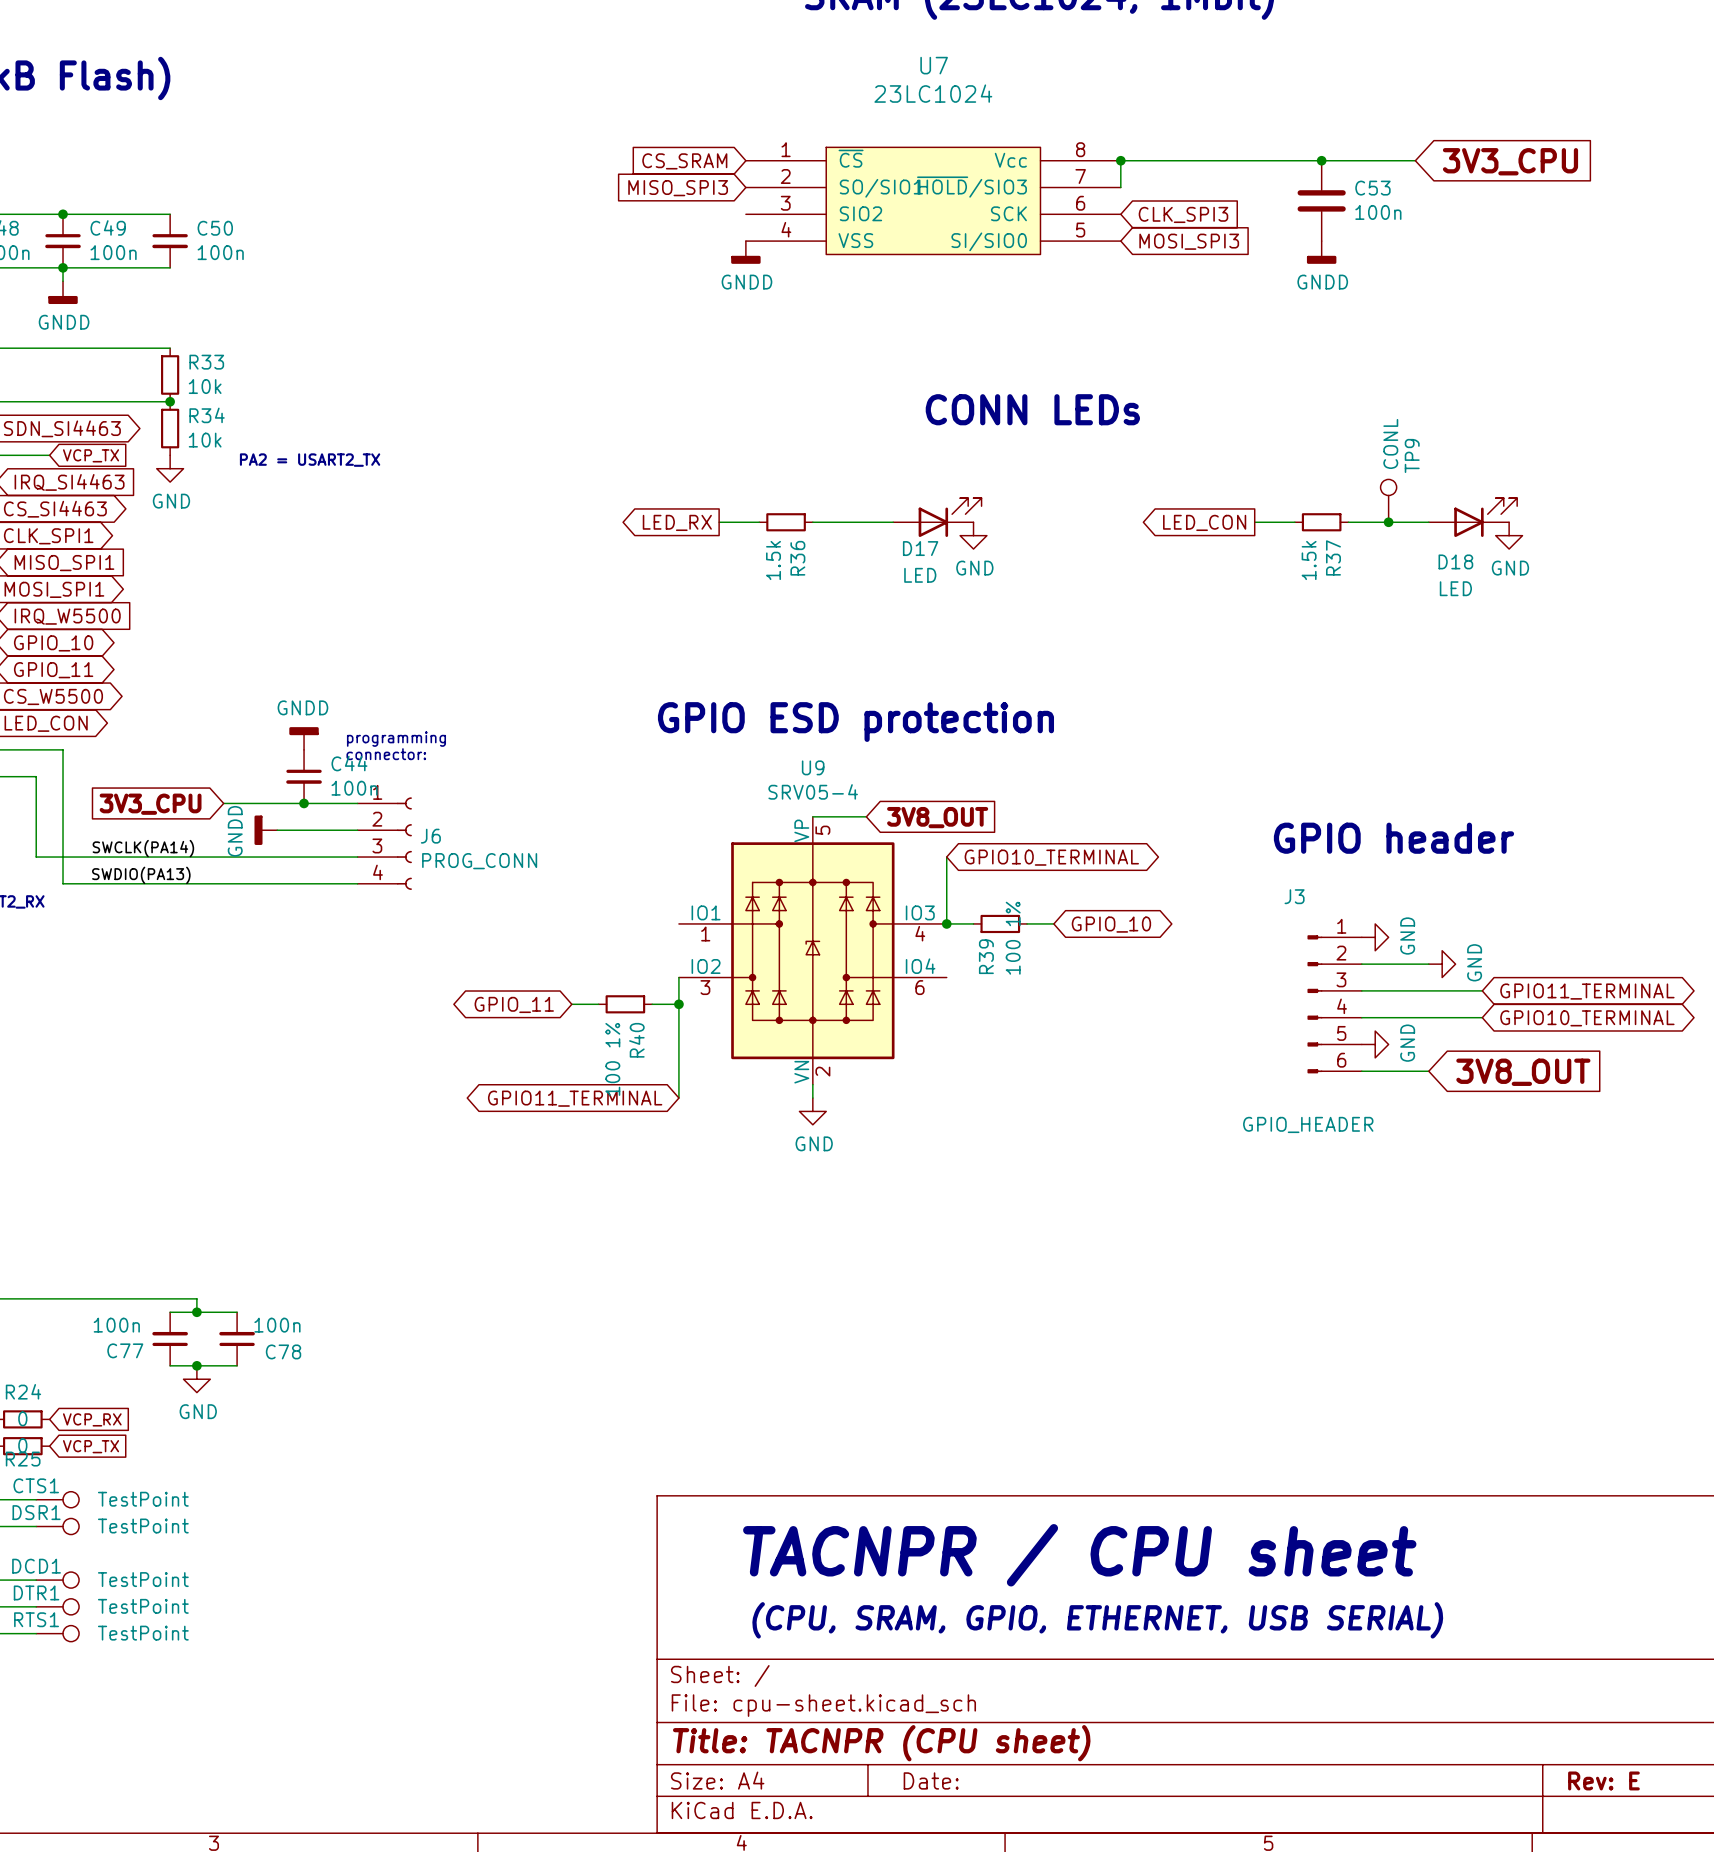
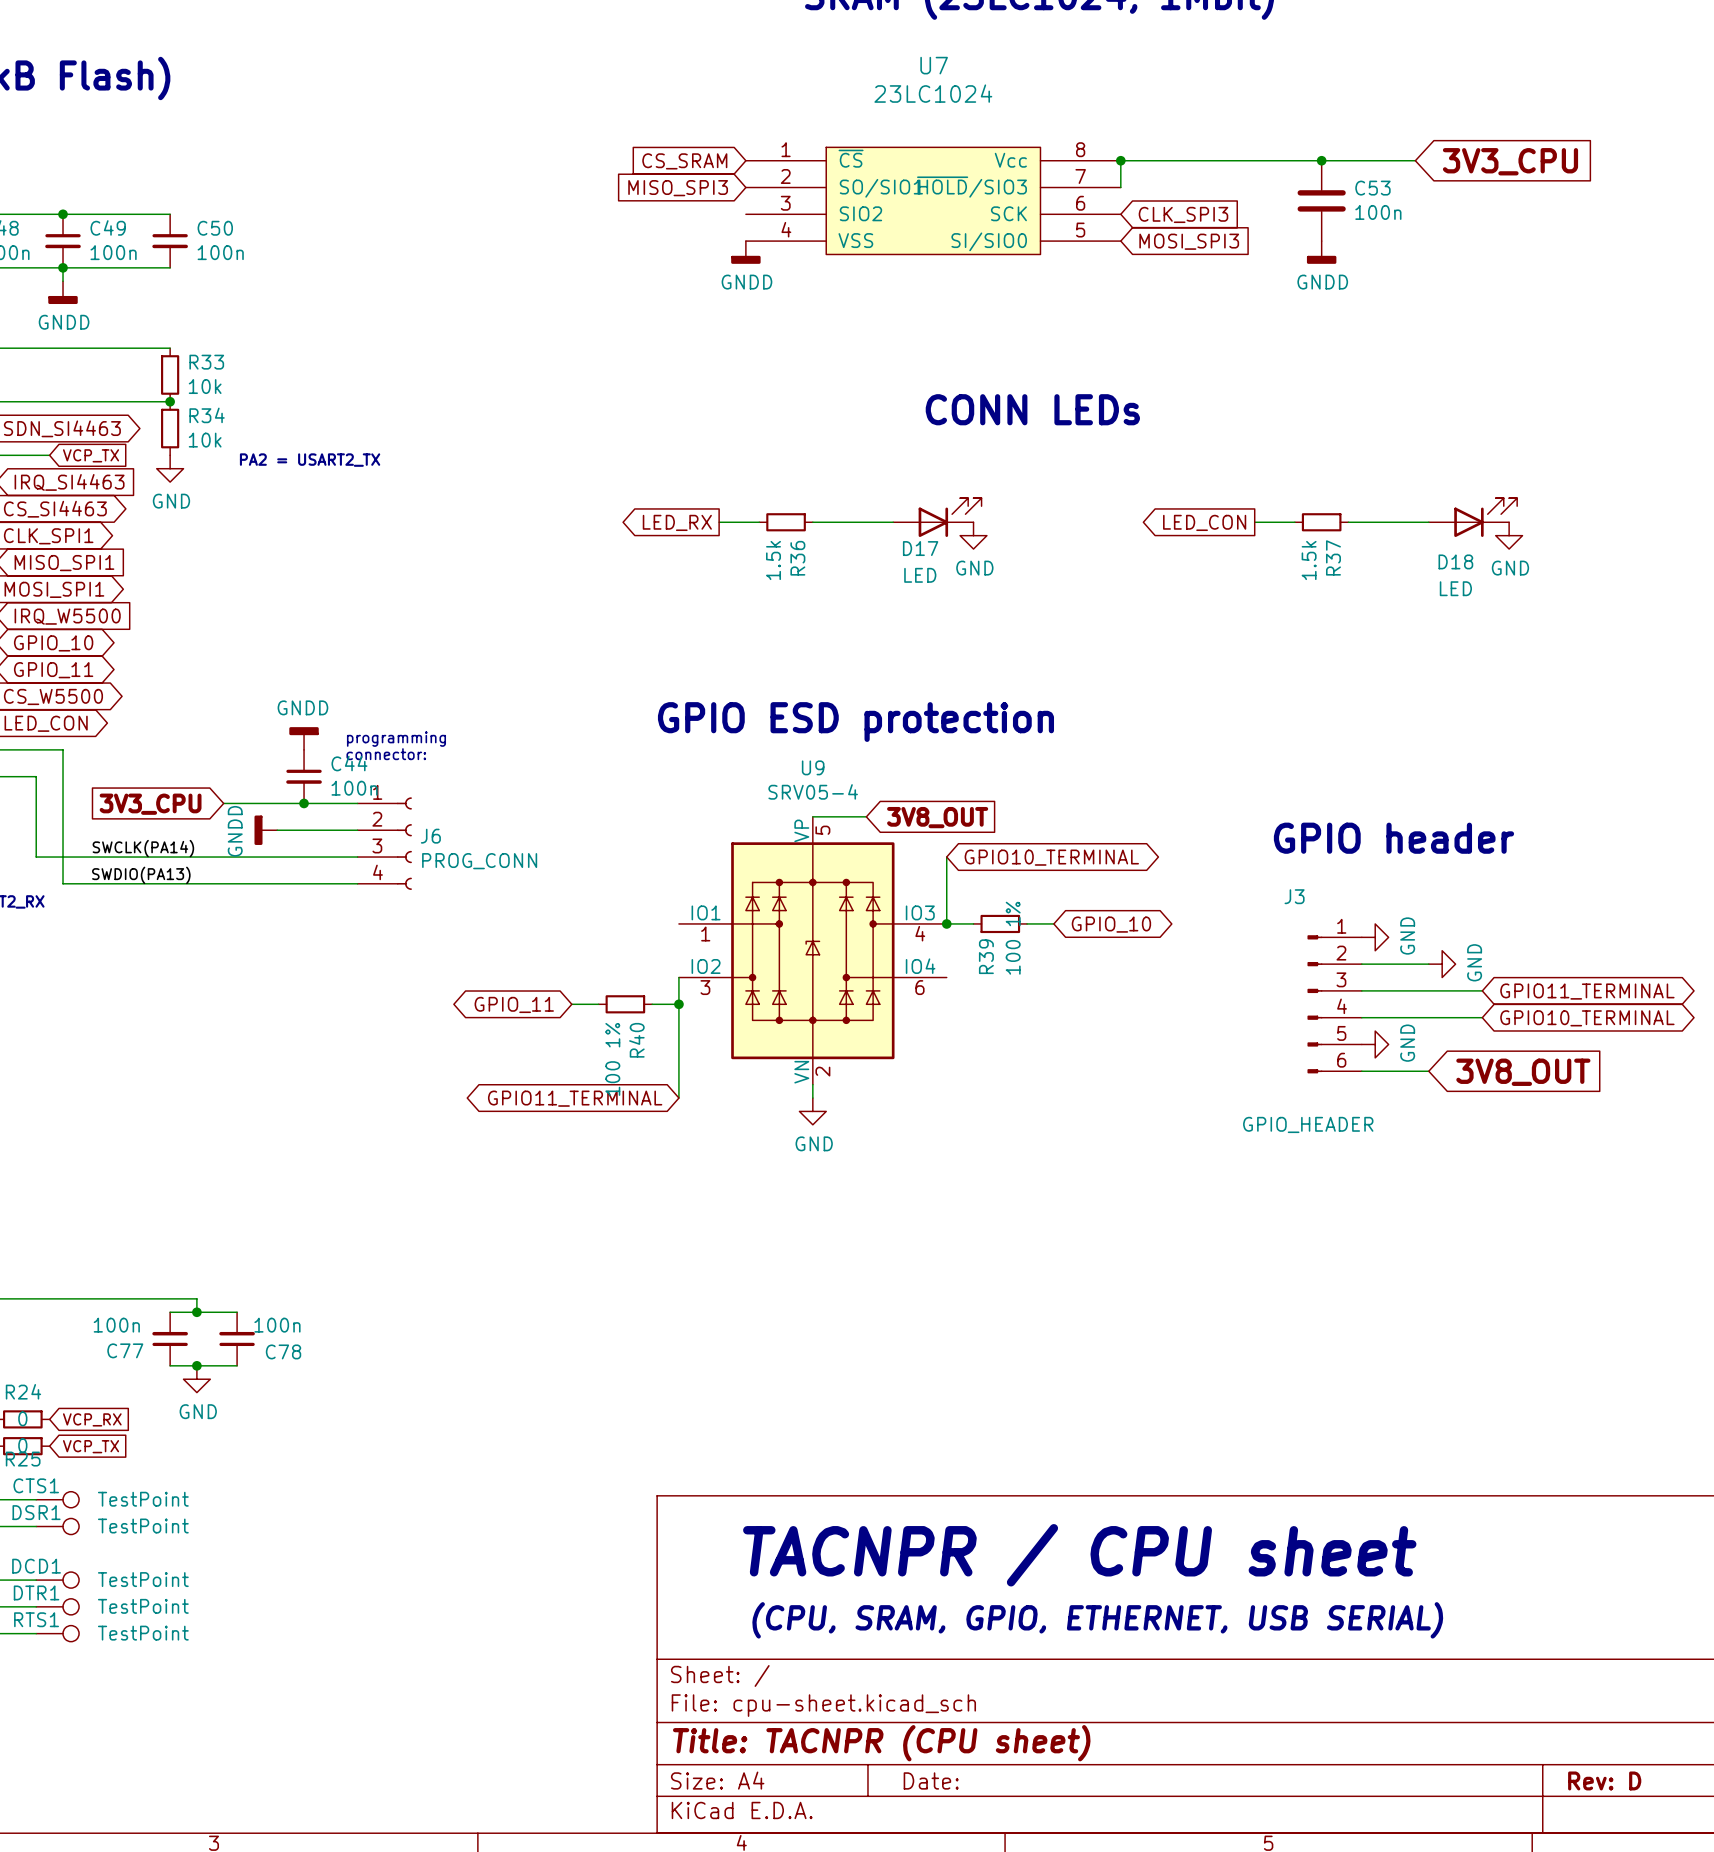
TP9: CONL (1388, 500) -> none
junction: (1388, 522) -> none
title block: Rev: E (1603, 1780) -> Rev: D (1604, 1780)

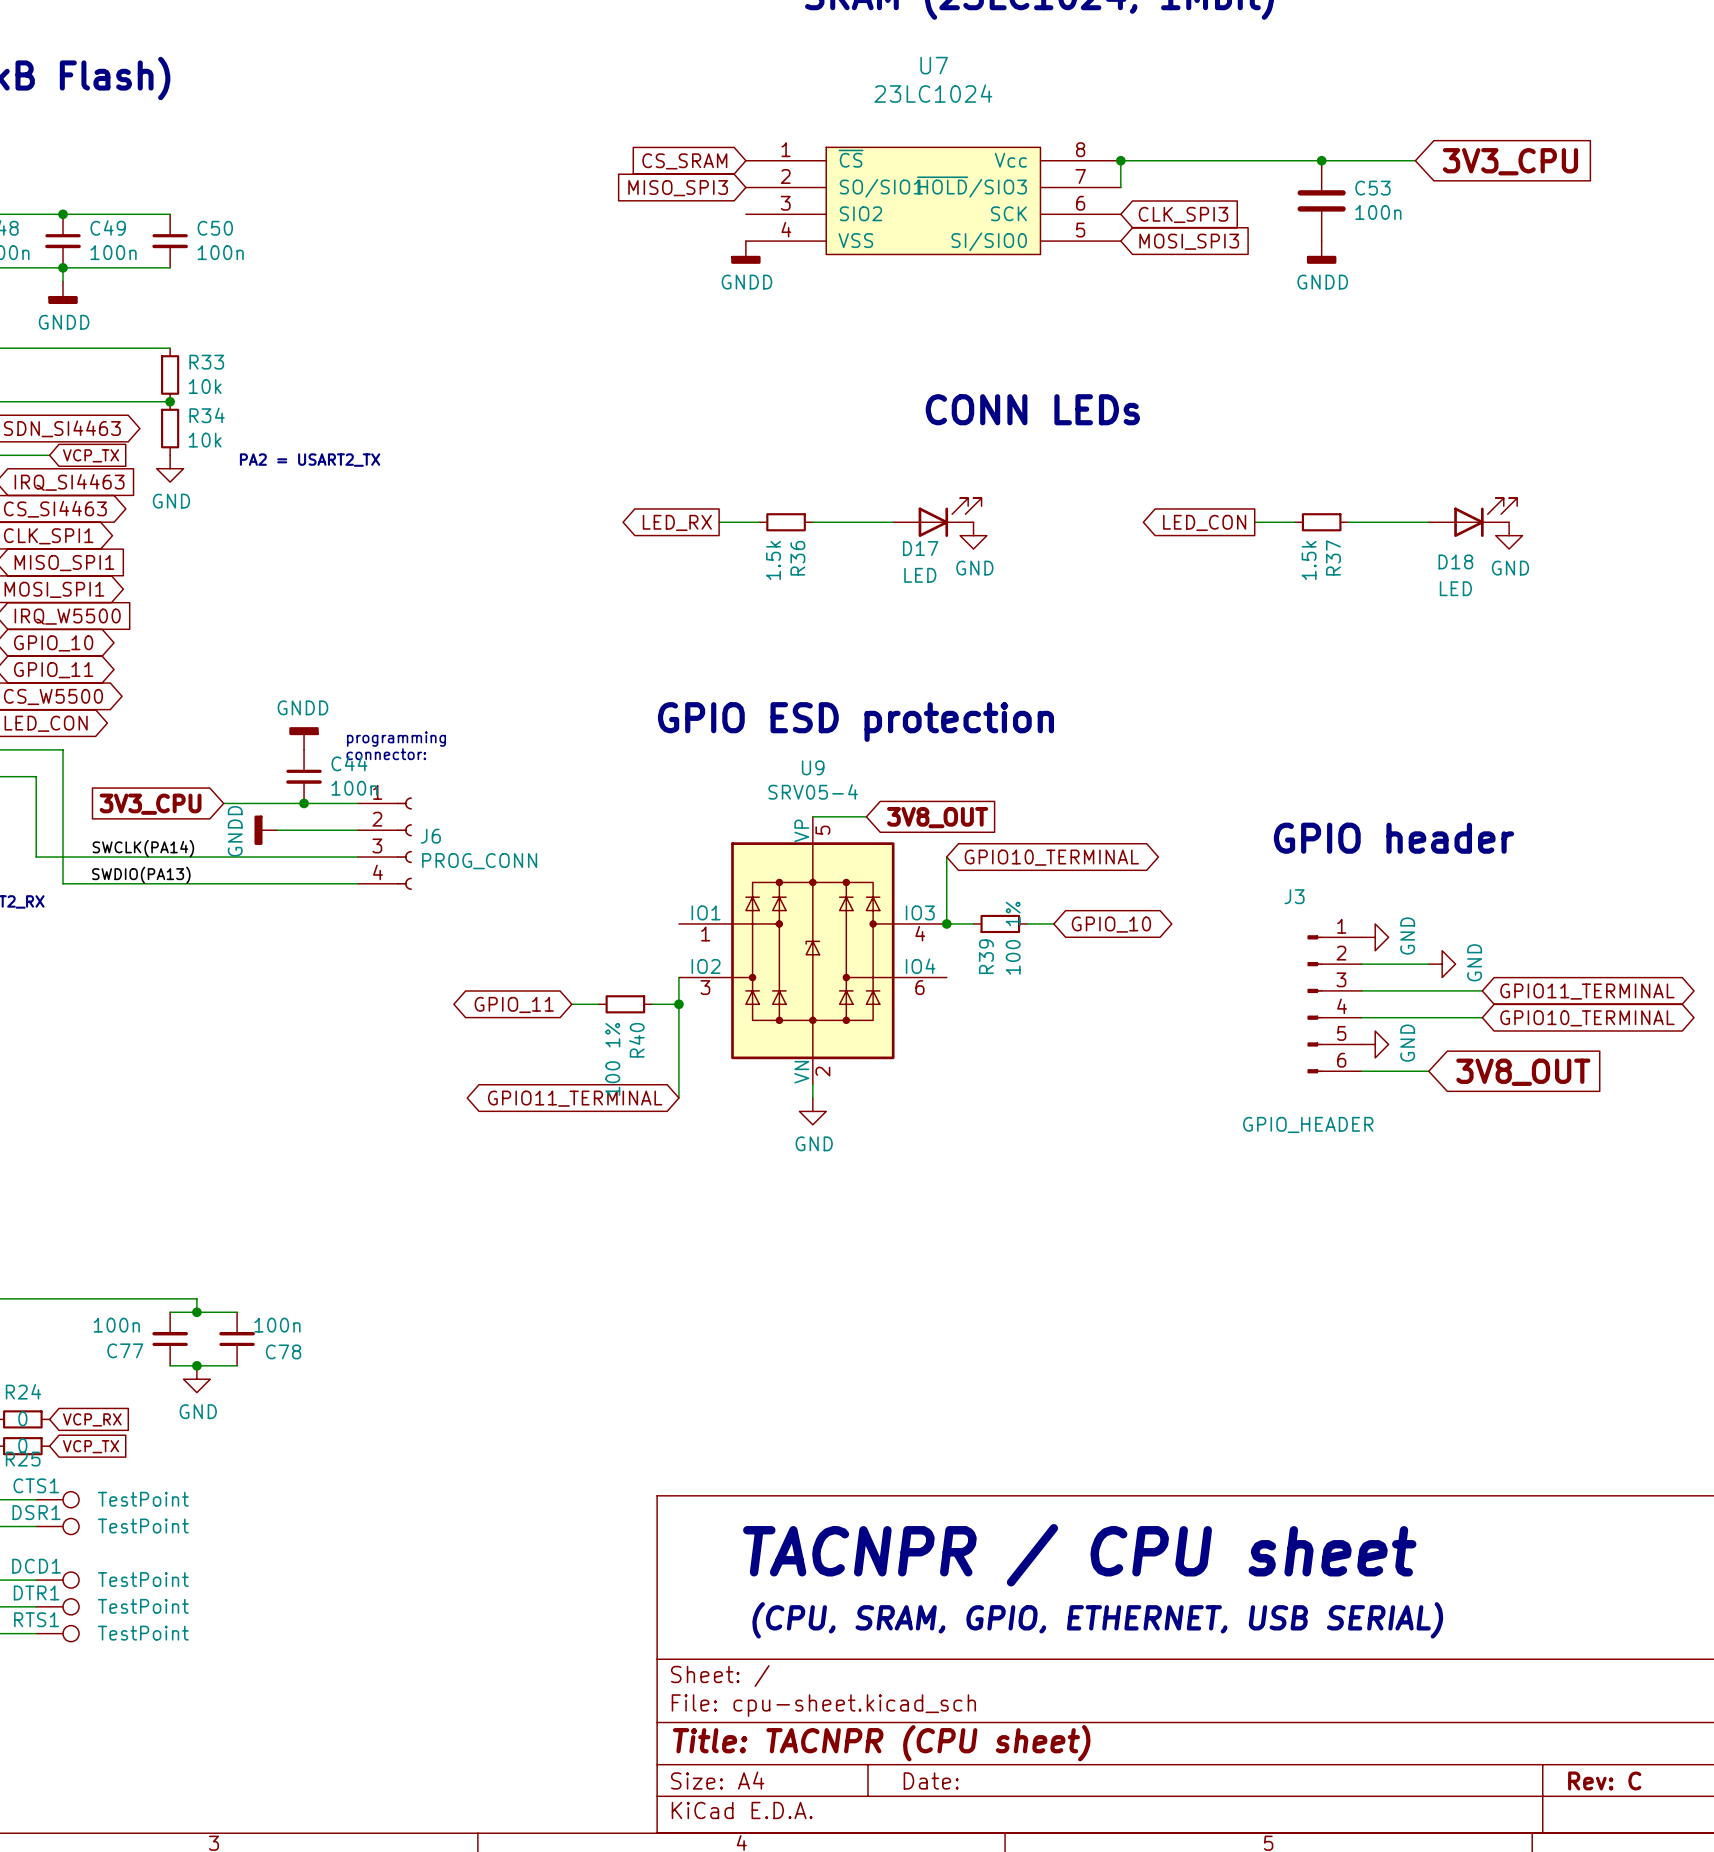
title block: Rev: D (1604, 1780) -> Rev: C (1604, 1780)

